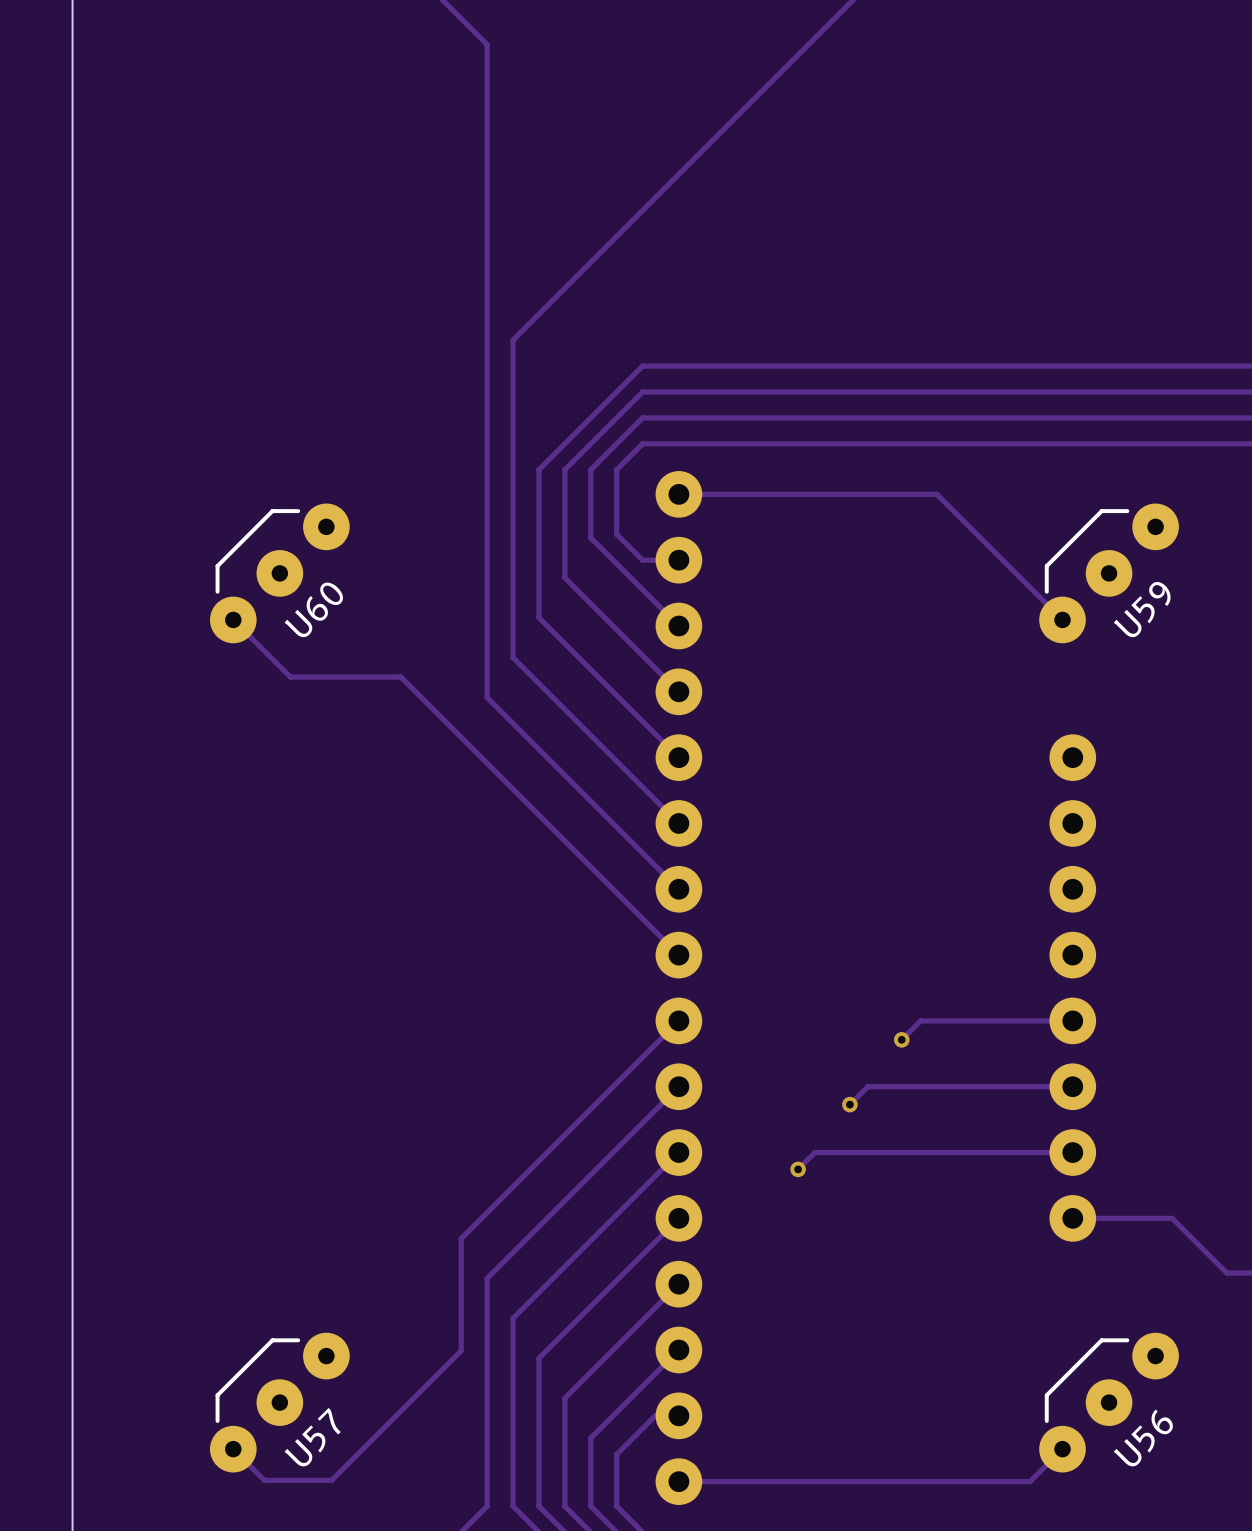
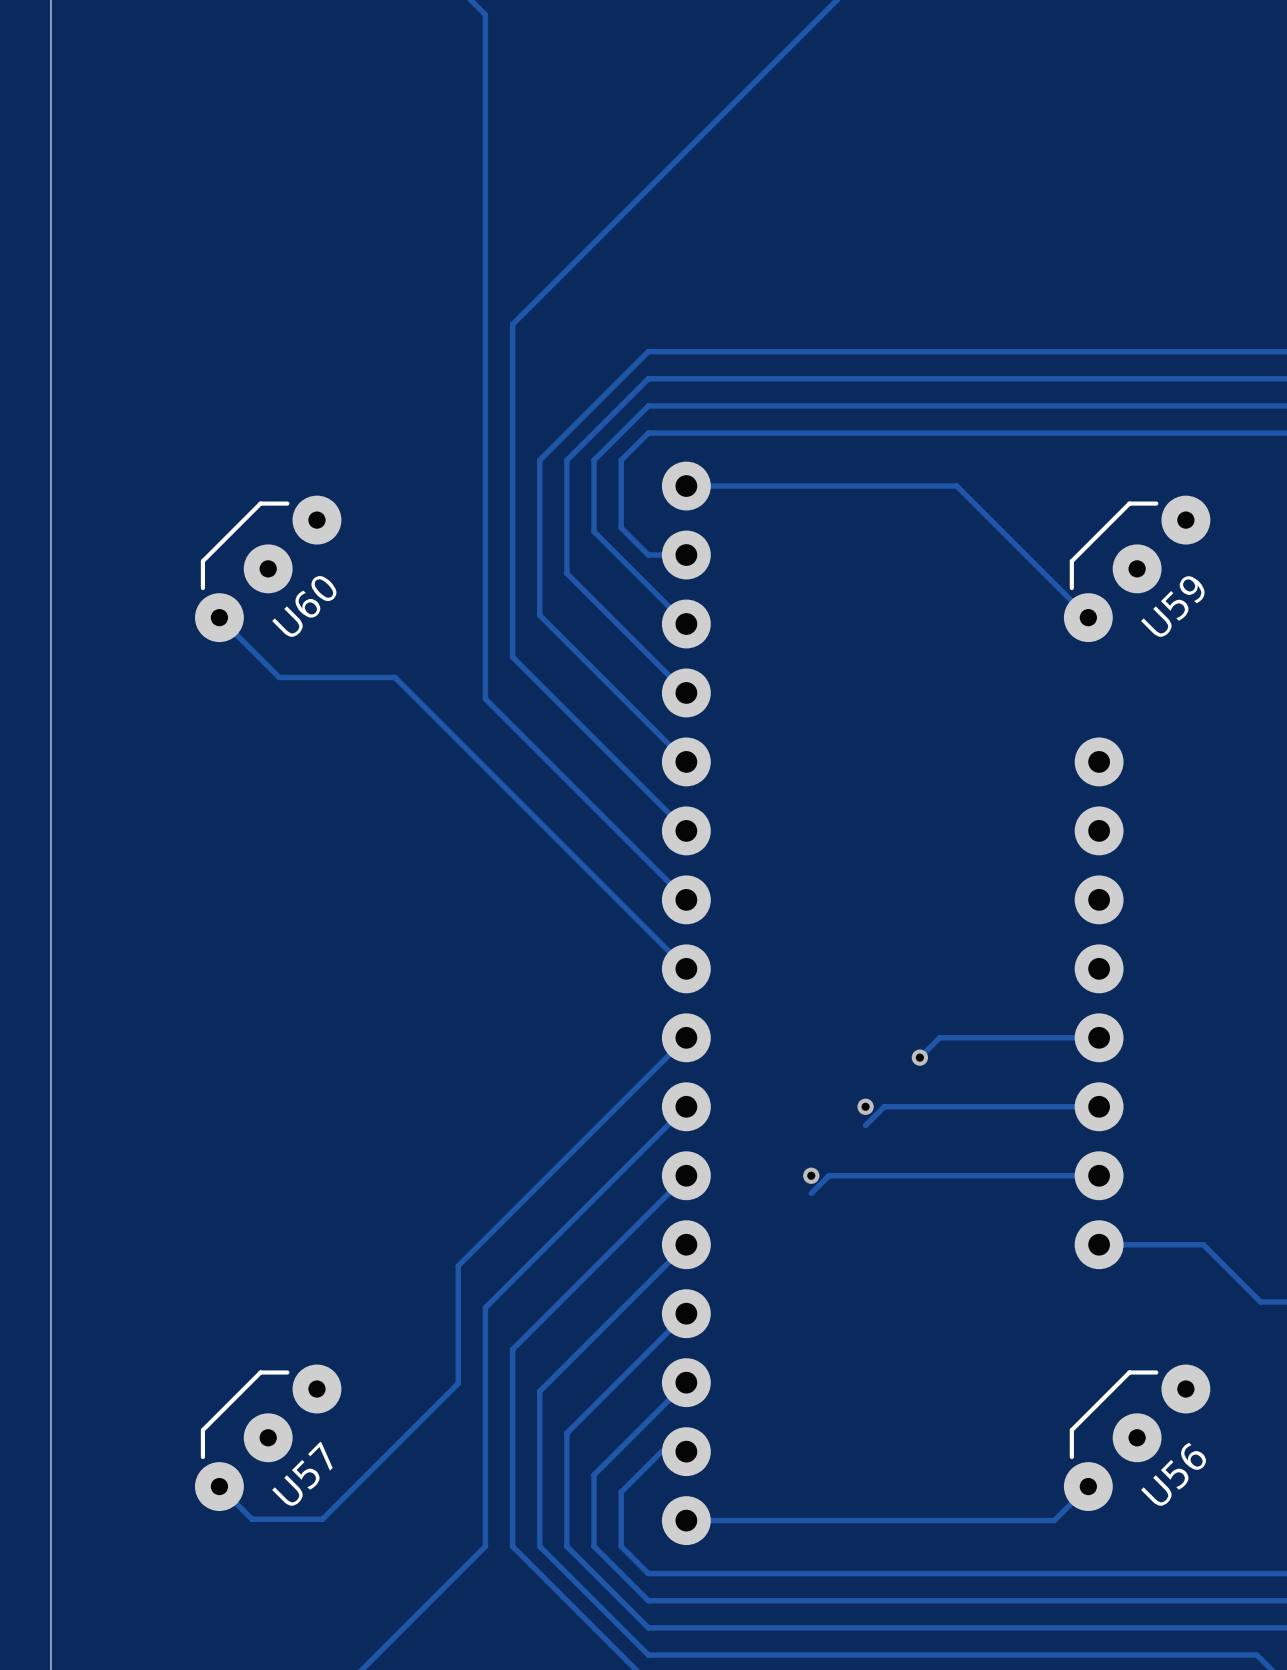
via position: (849, 1104) -> (865, 1106)
via position: (798, 1169) -> (811, 1175)

